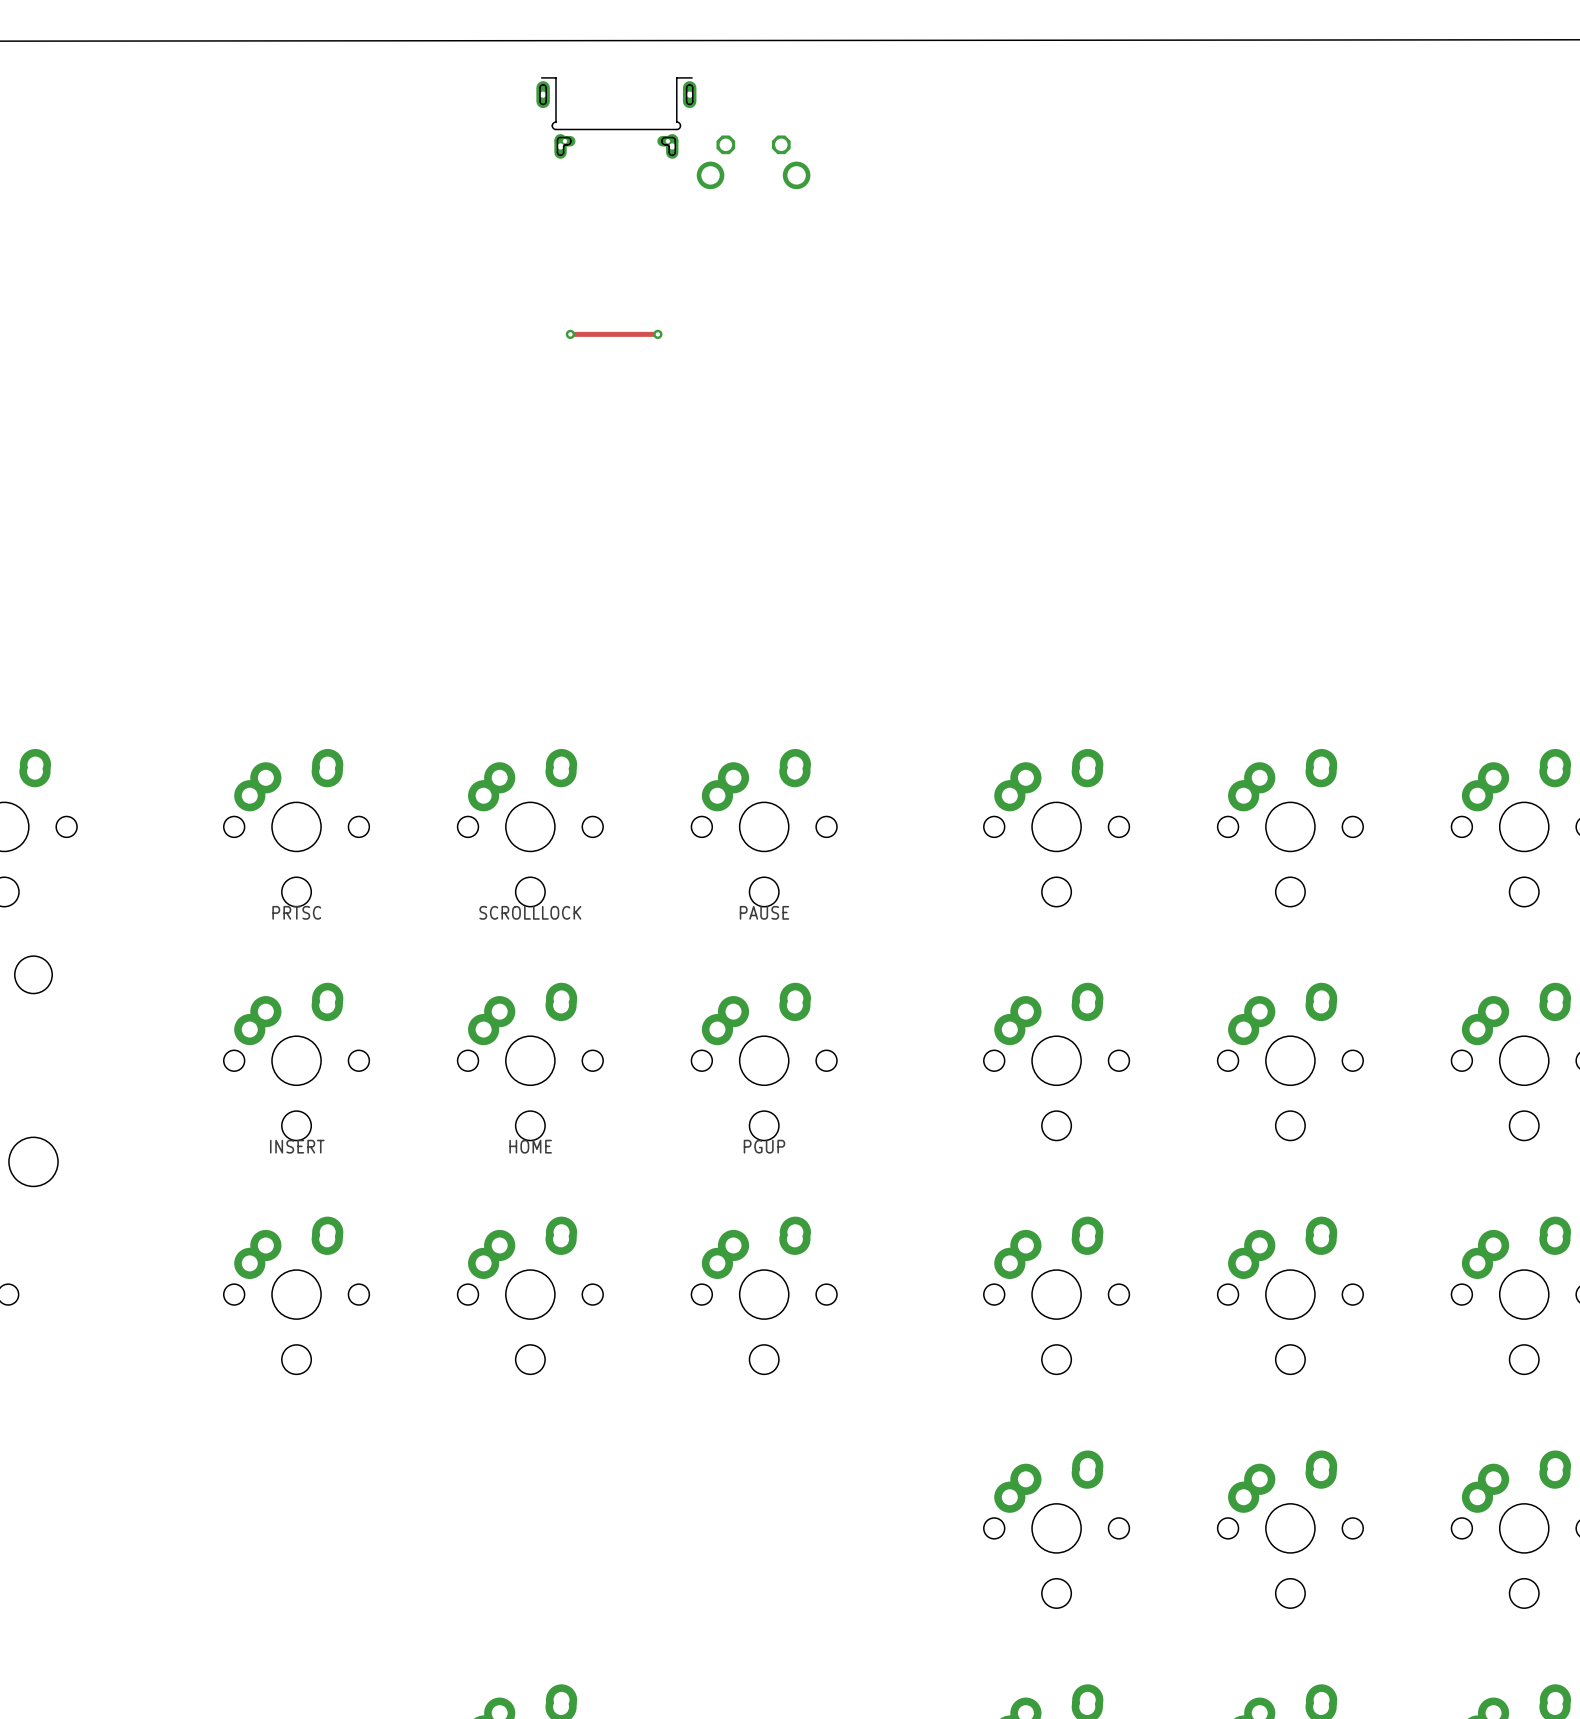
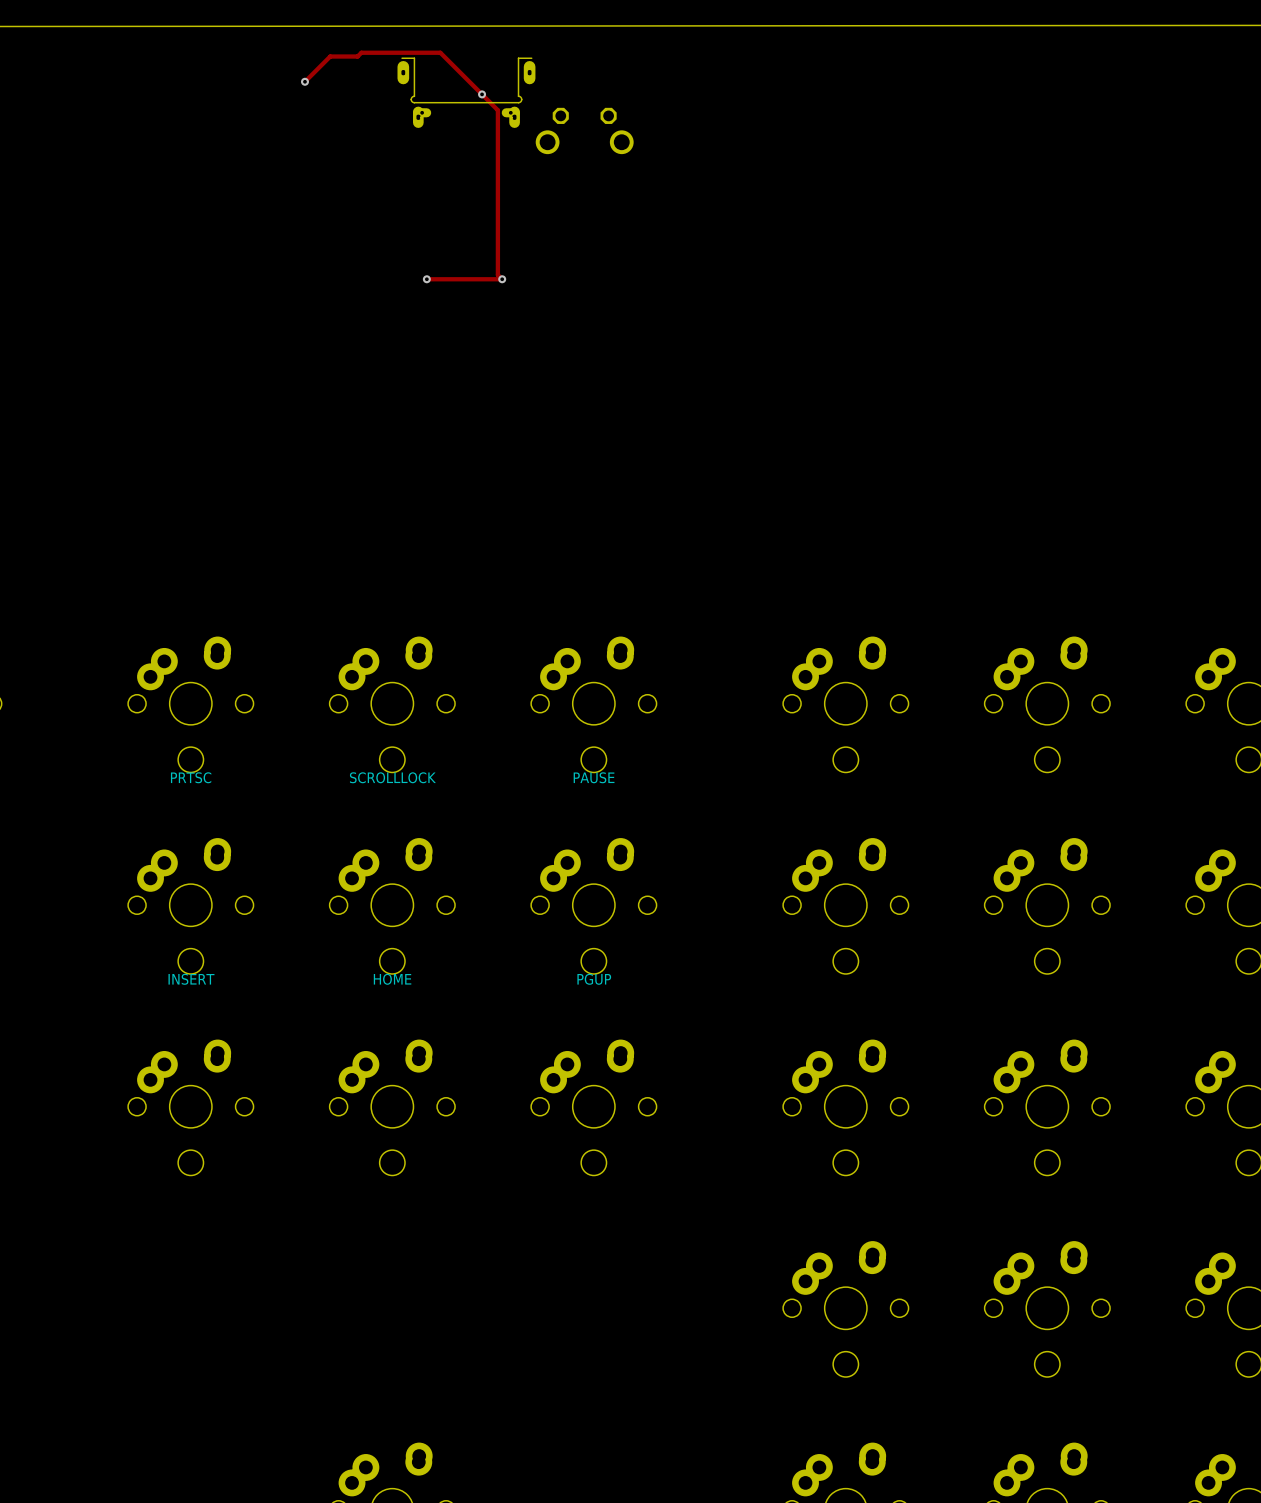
track: none -> (304, 81) (330, 56) (357, 56) (361, 52) (440, 52) (497, 110) (497, 274) (502, 279)
via: none -> (304, 81)
via: none -> (482, 94)

